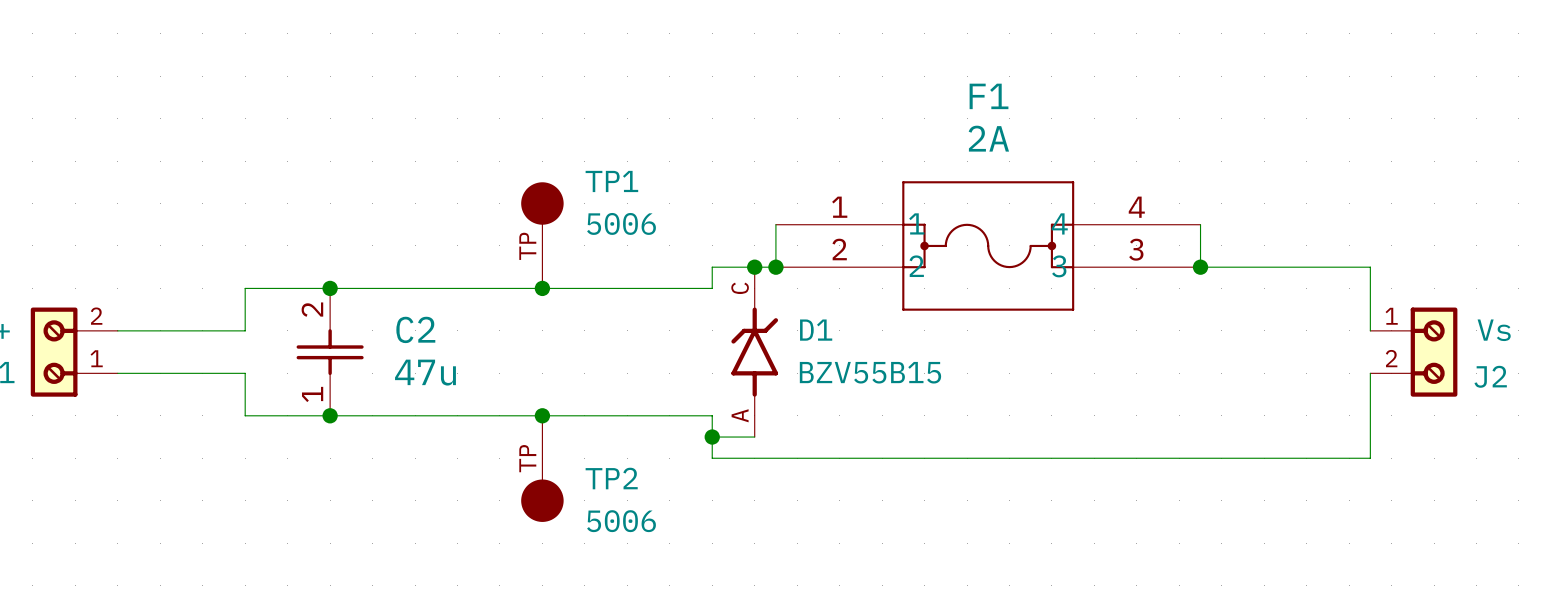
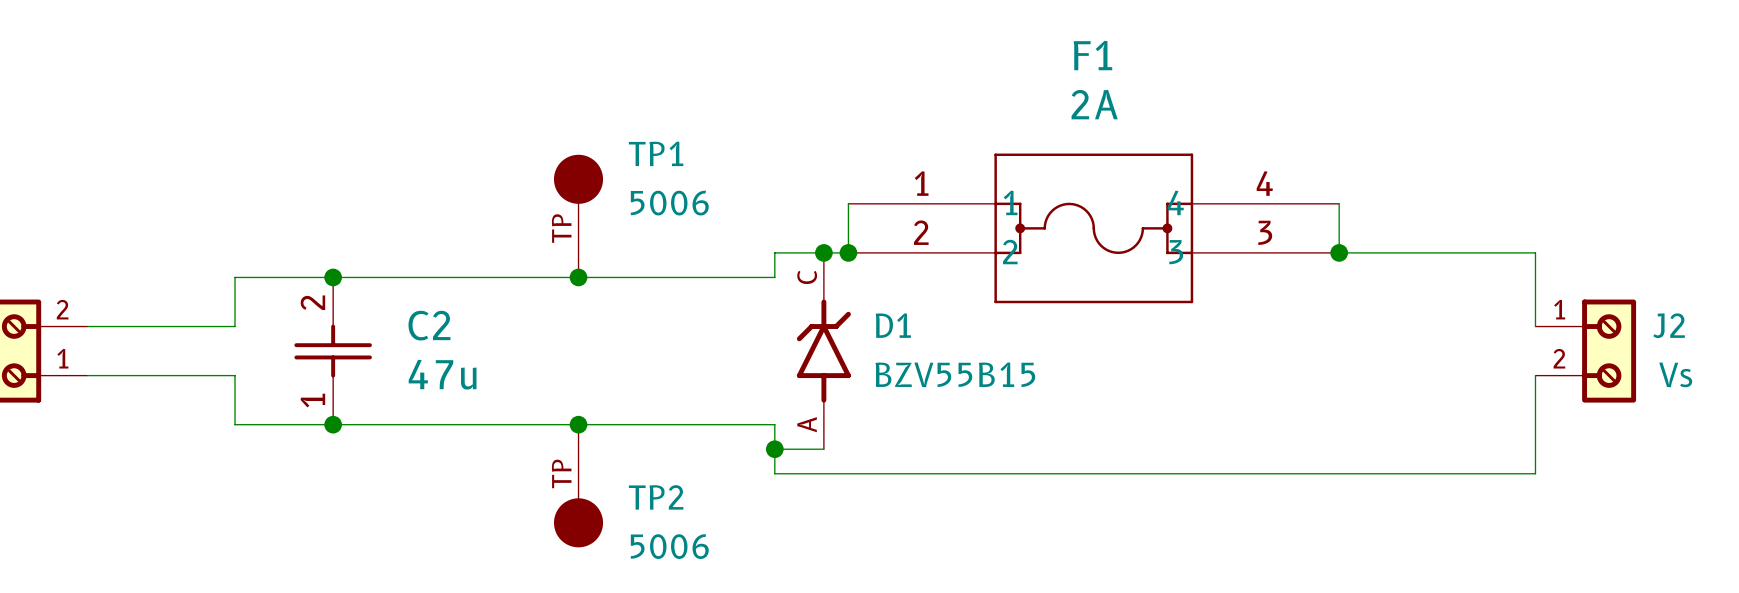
J2 value position: Vs (1494, 330) -> Vs (1675, 374)
J2 name position: J2 (1490, 376) -> J2 (1669, 325)

